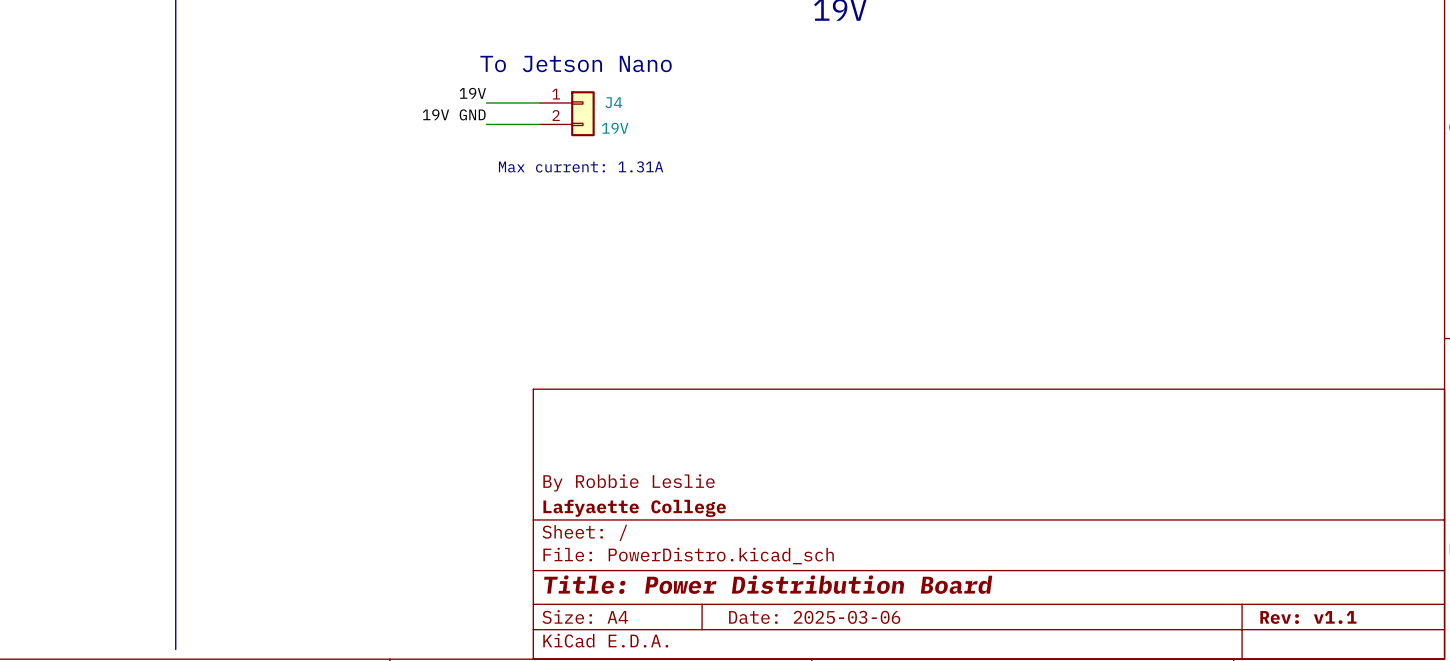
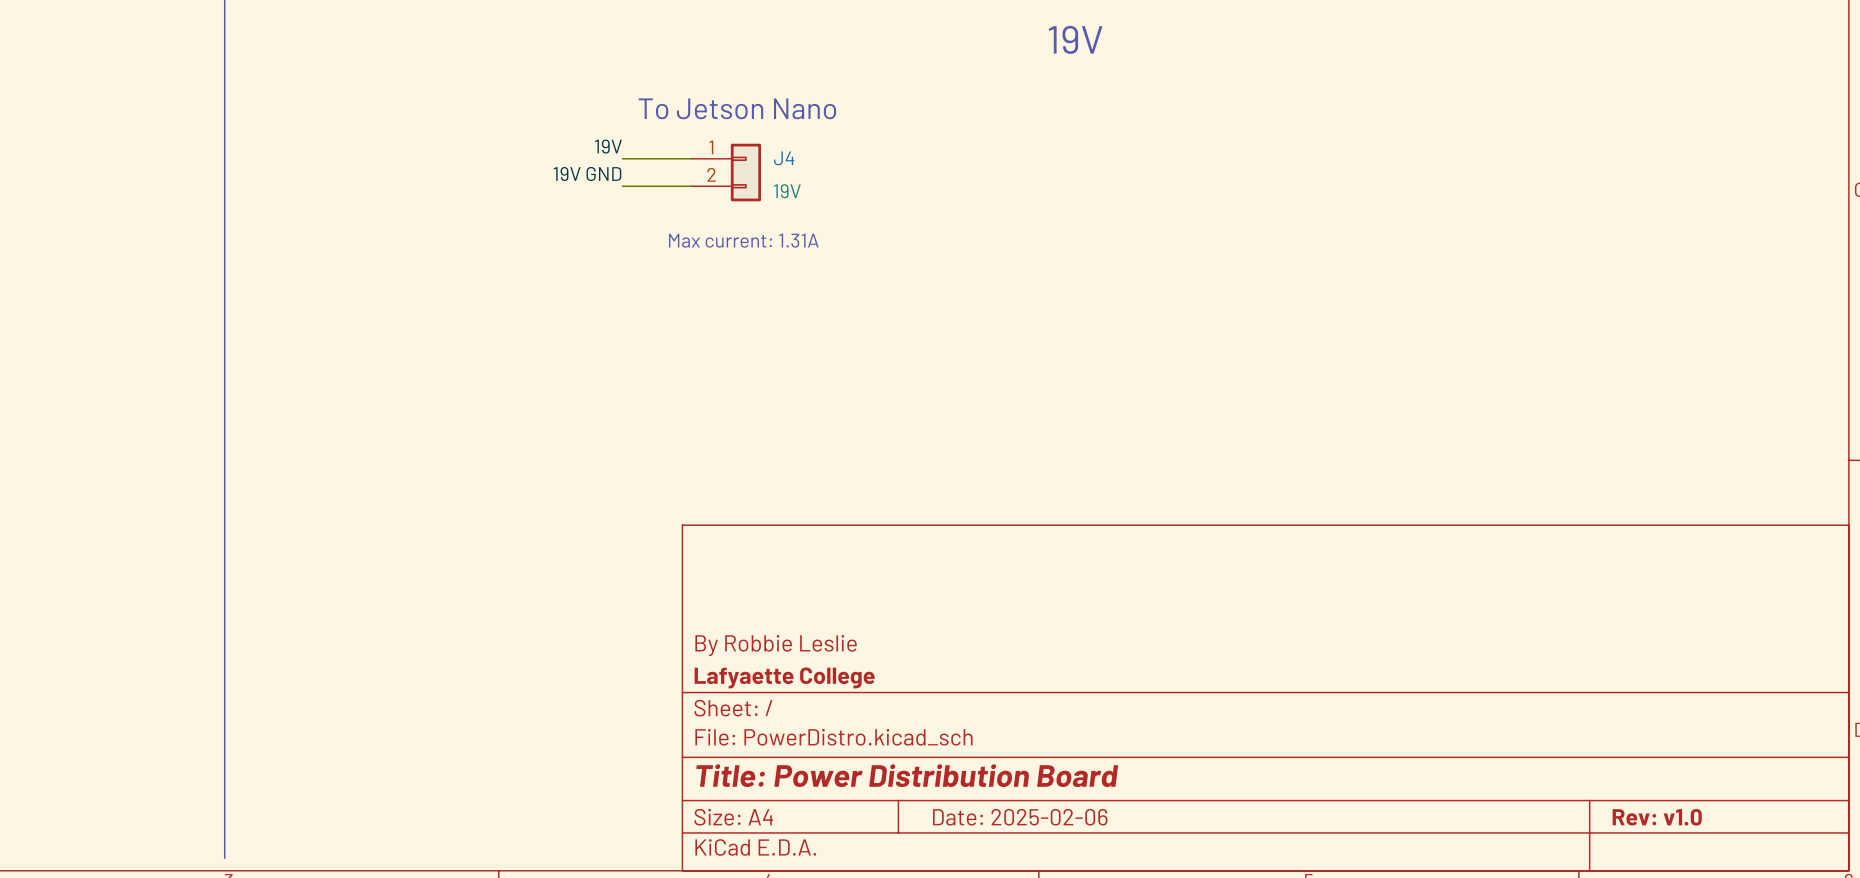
title block: Date: 2025-03-06 (814, 617) -> Date: 2025-02-06 (1020, 817)
title block: Rev: v1.1 (1308, 617) -> Rev: v1.0 (1657, 817)

